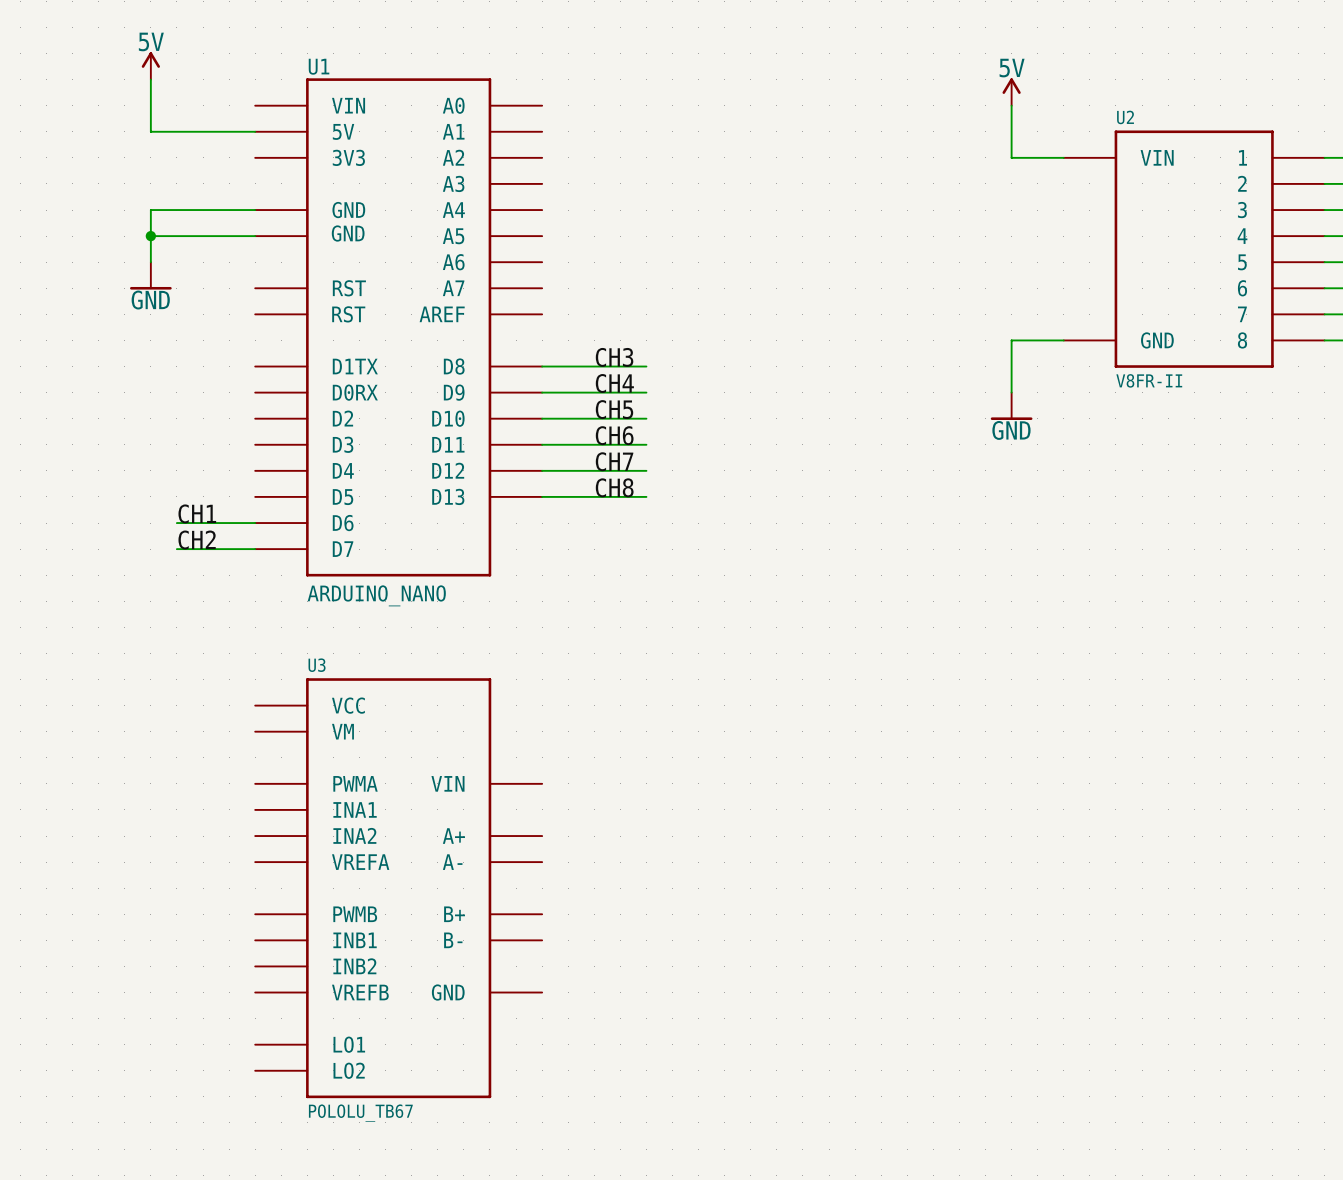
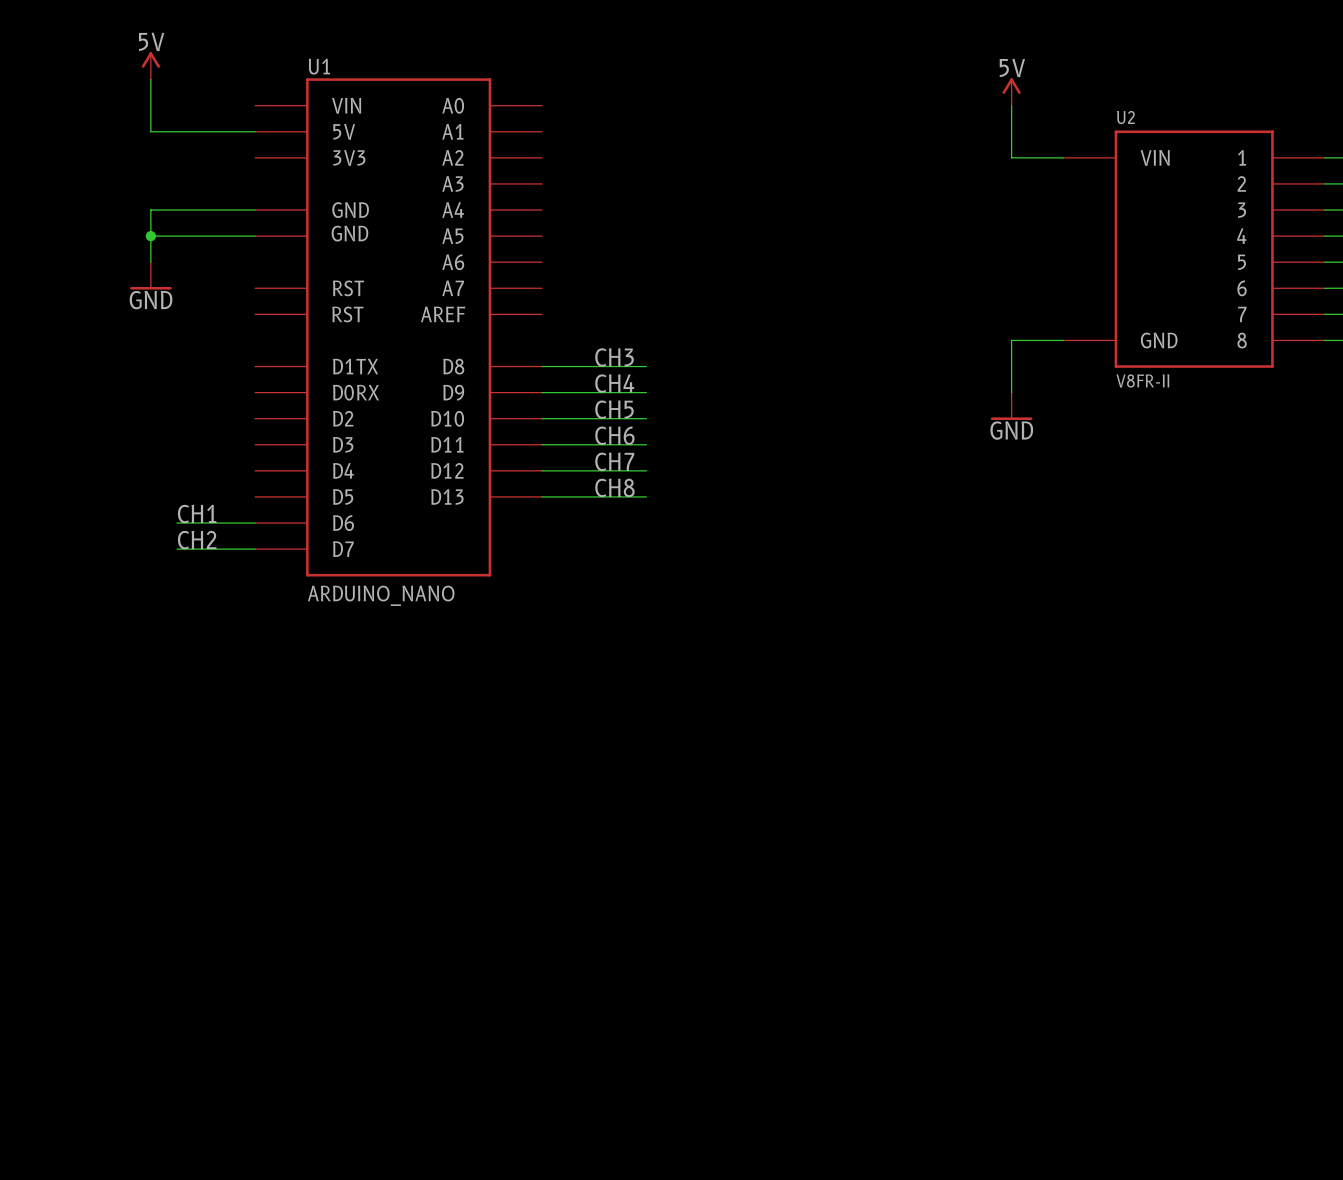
U3: POLOLU_TB67 (398, 888) -> none

